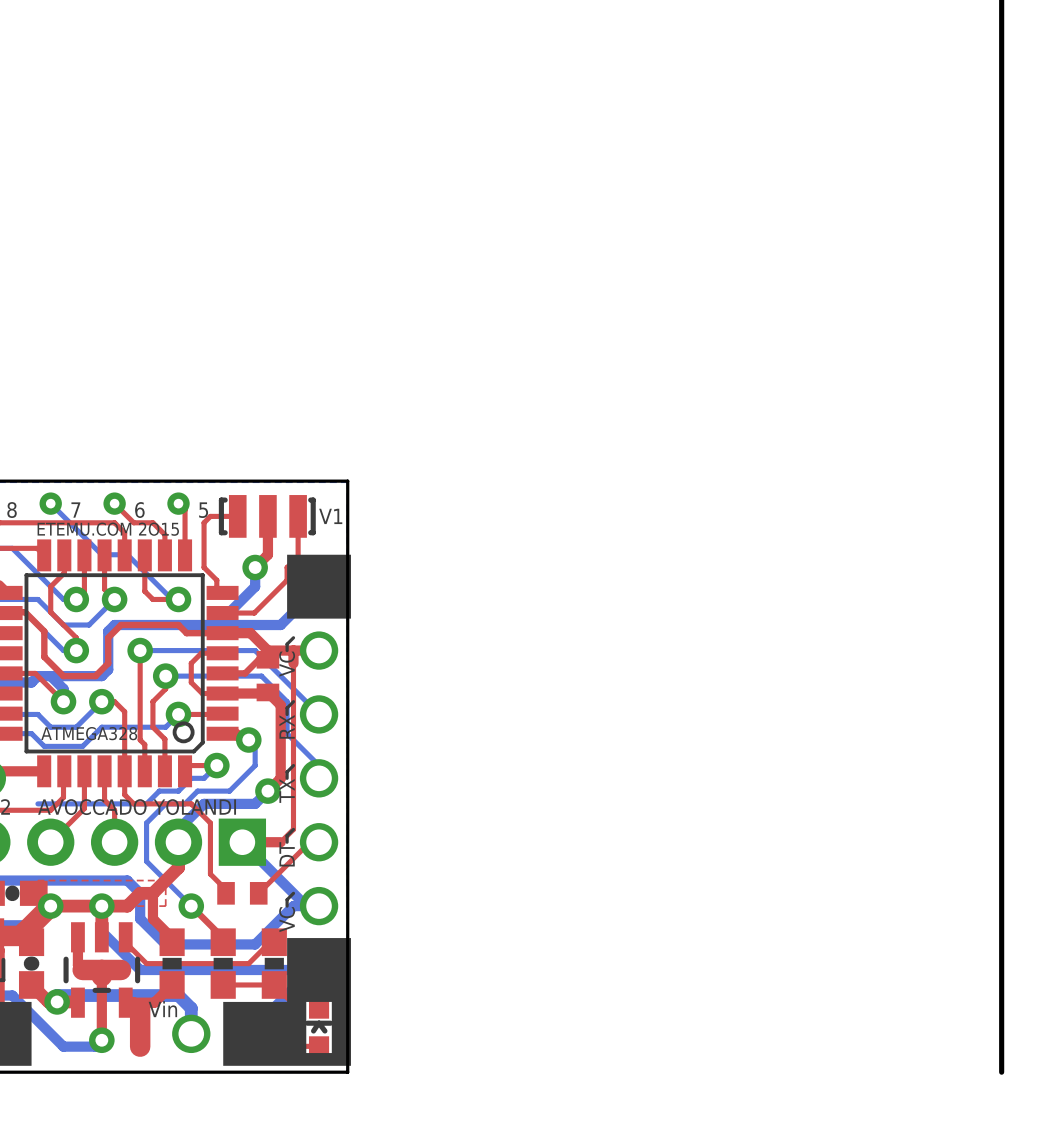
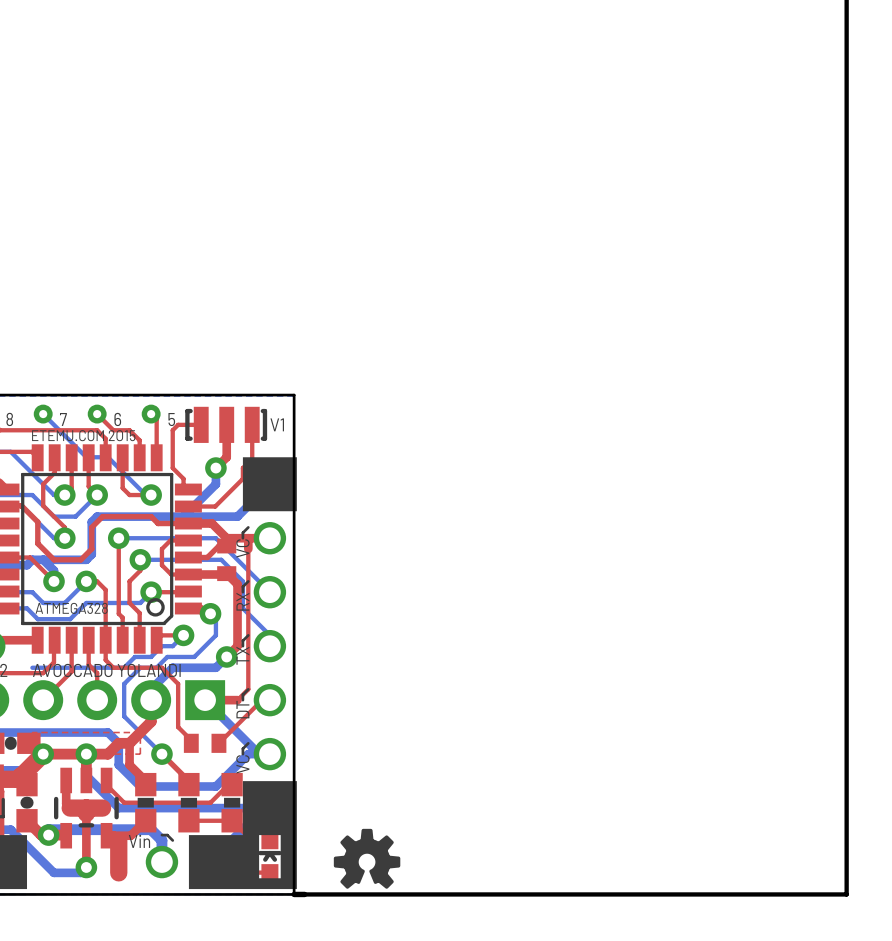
drawing: none -> [333, 828, 401, 889]
line: none -> (161, 835) (167, 835) (172, 840)
board edge: none -> (294, 894) (846, 894)

